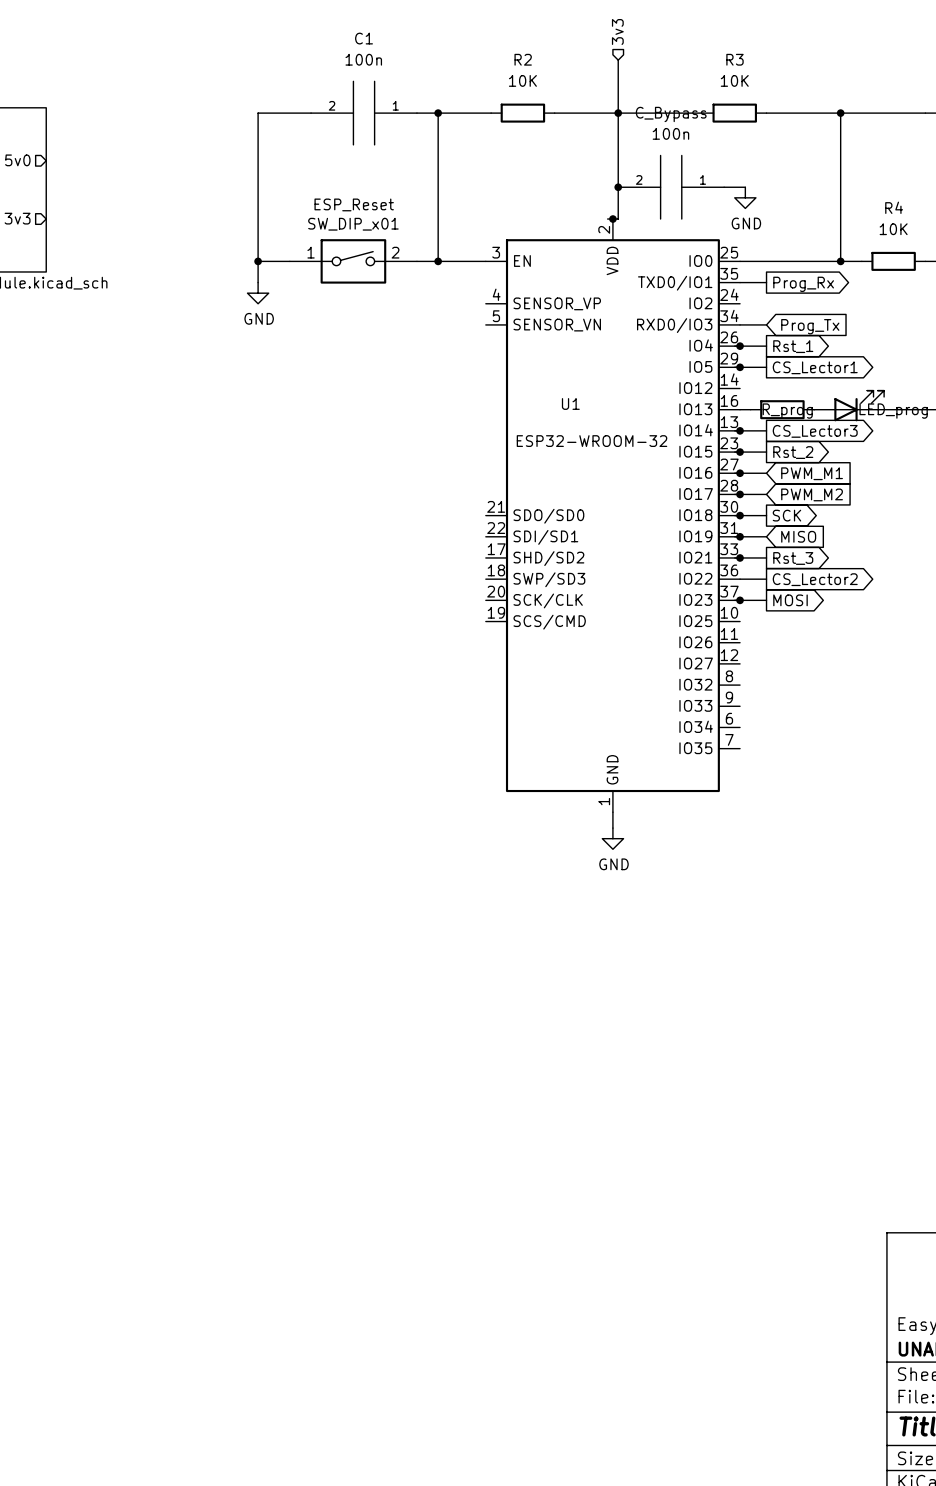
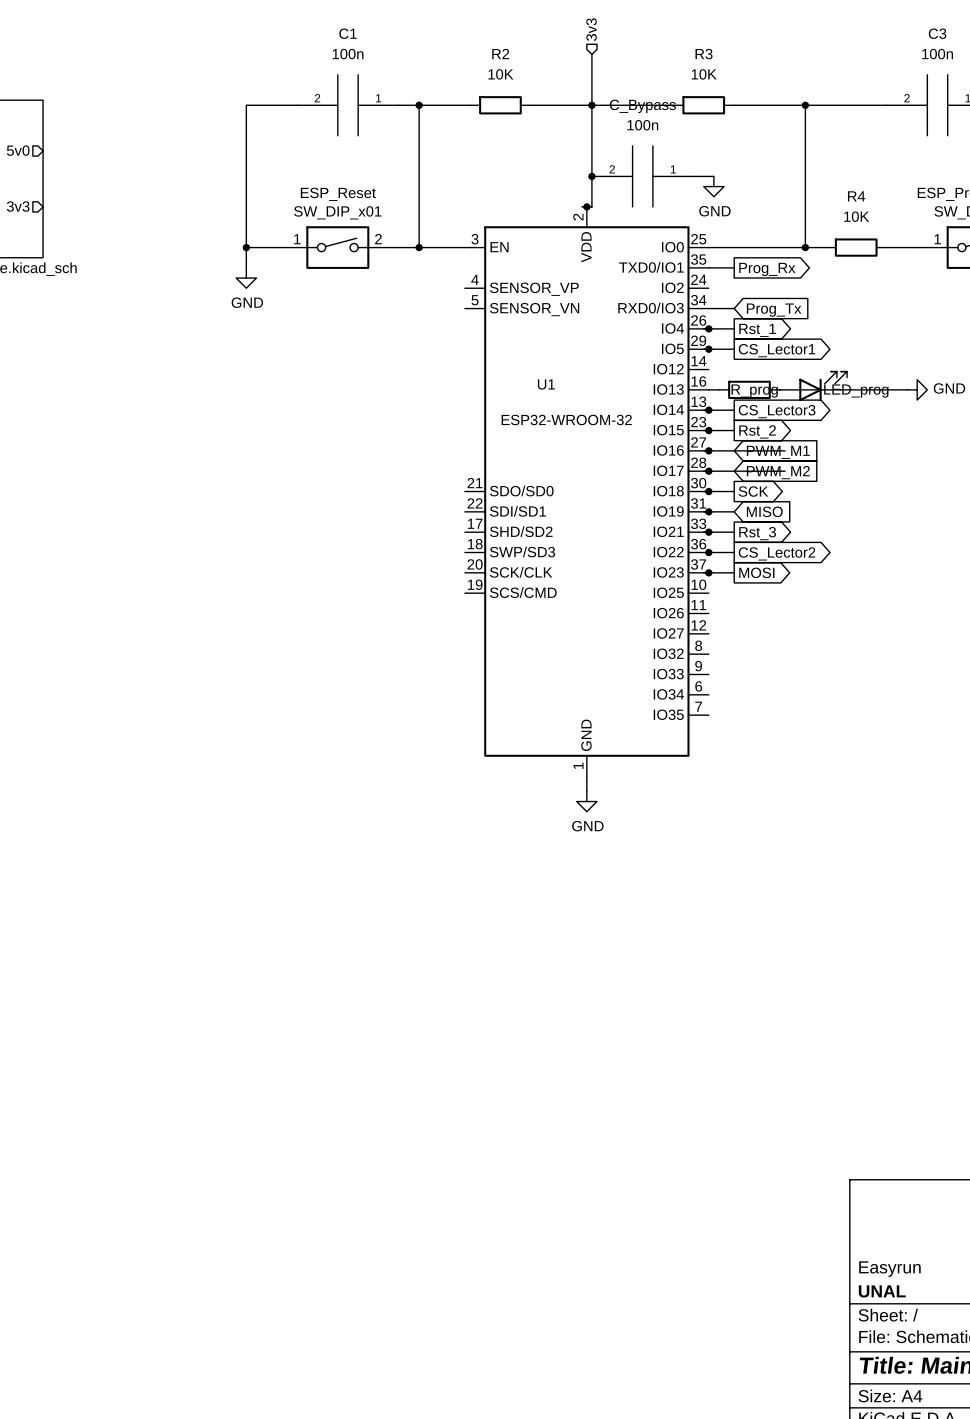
wire: none -> (734, 450) (785, 450)
wire: none -> (734, 471) (785, 471)
junction: none -> (708, 552)

